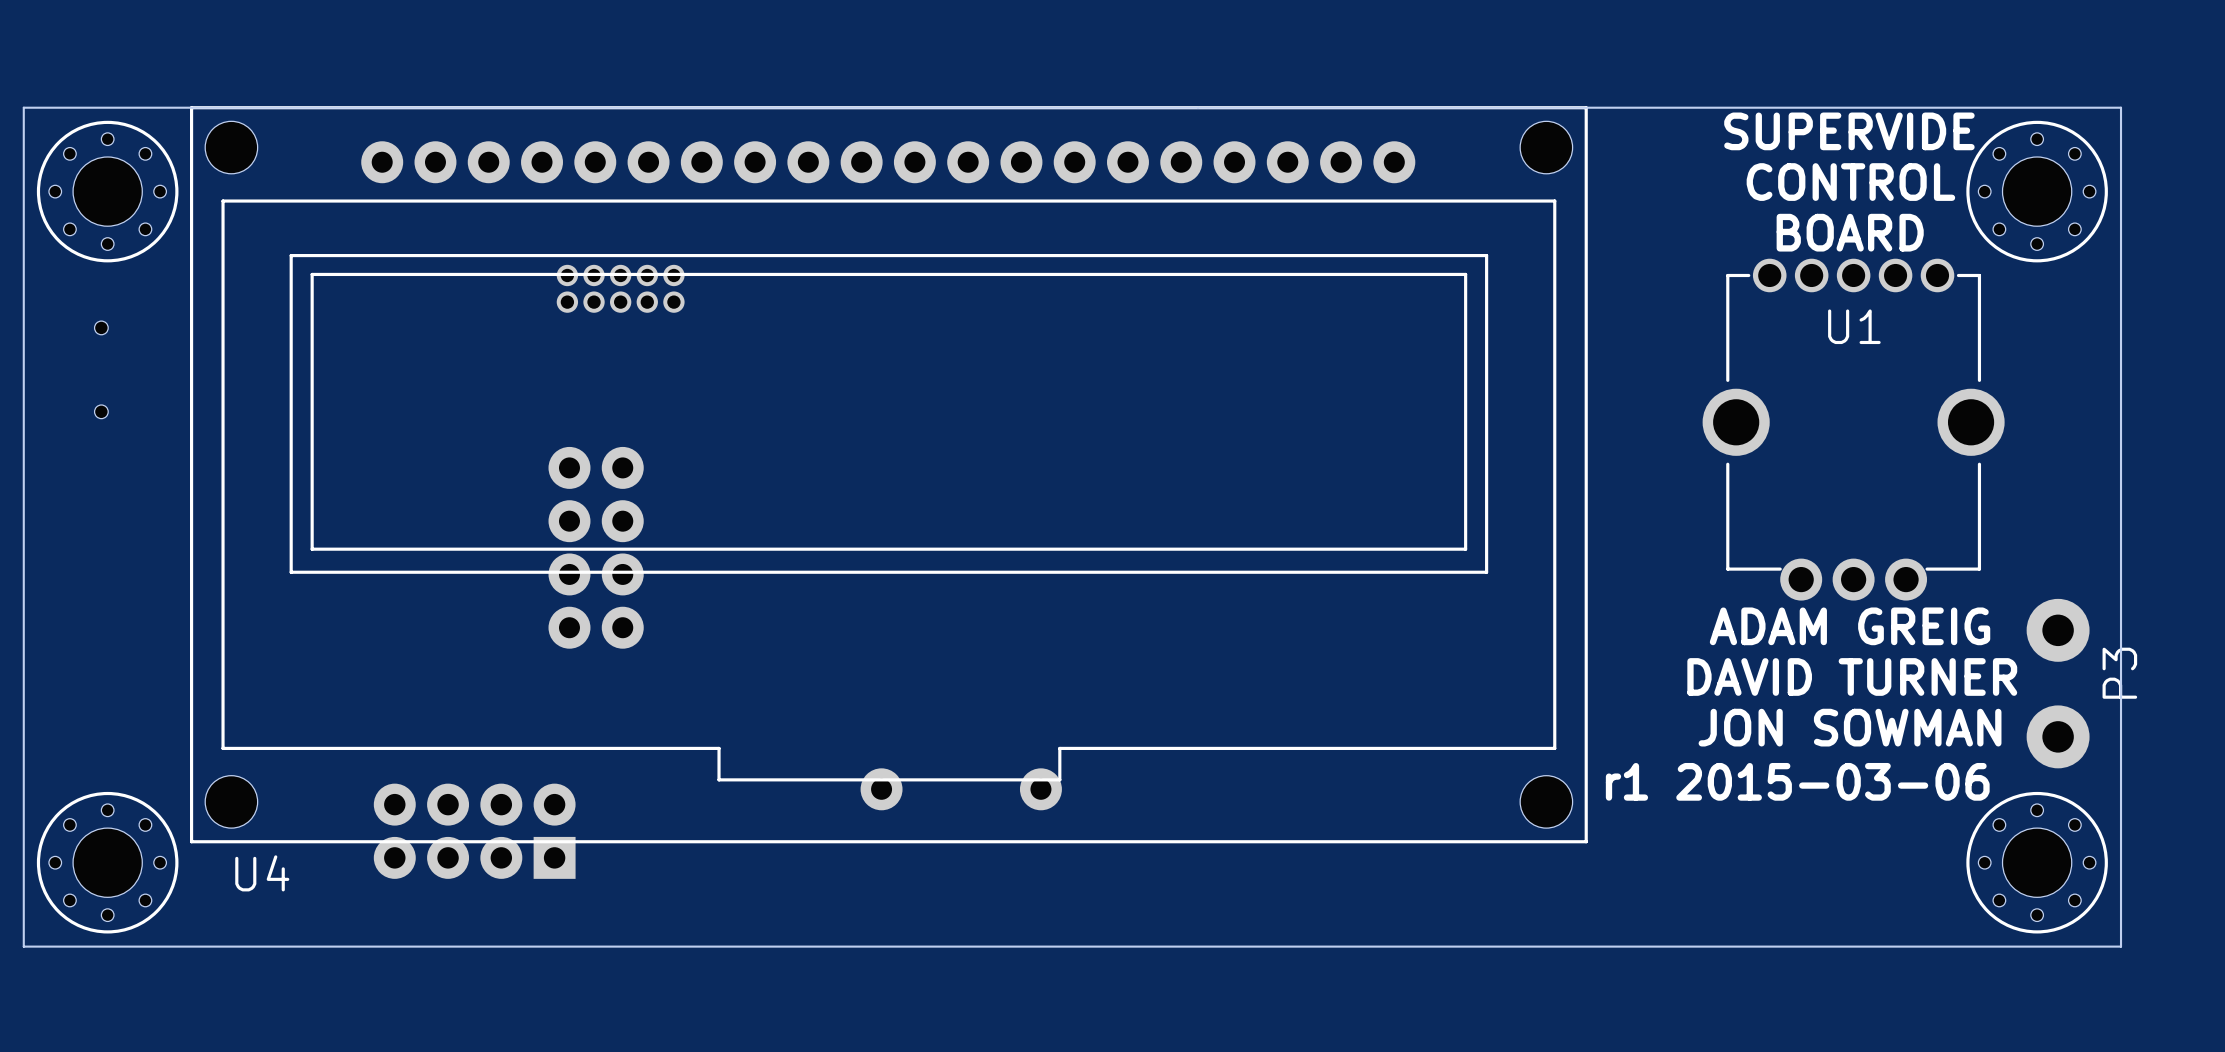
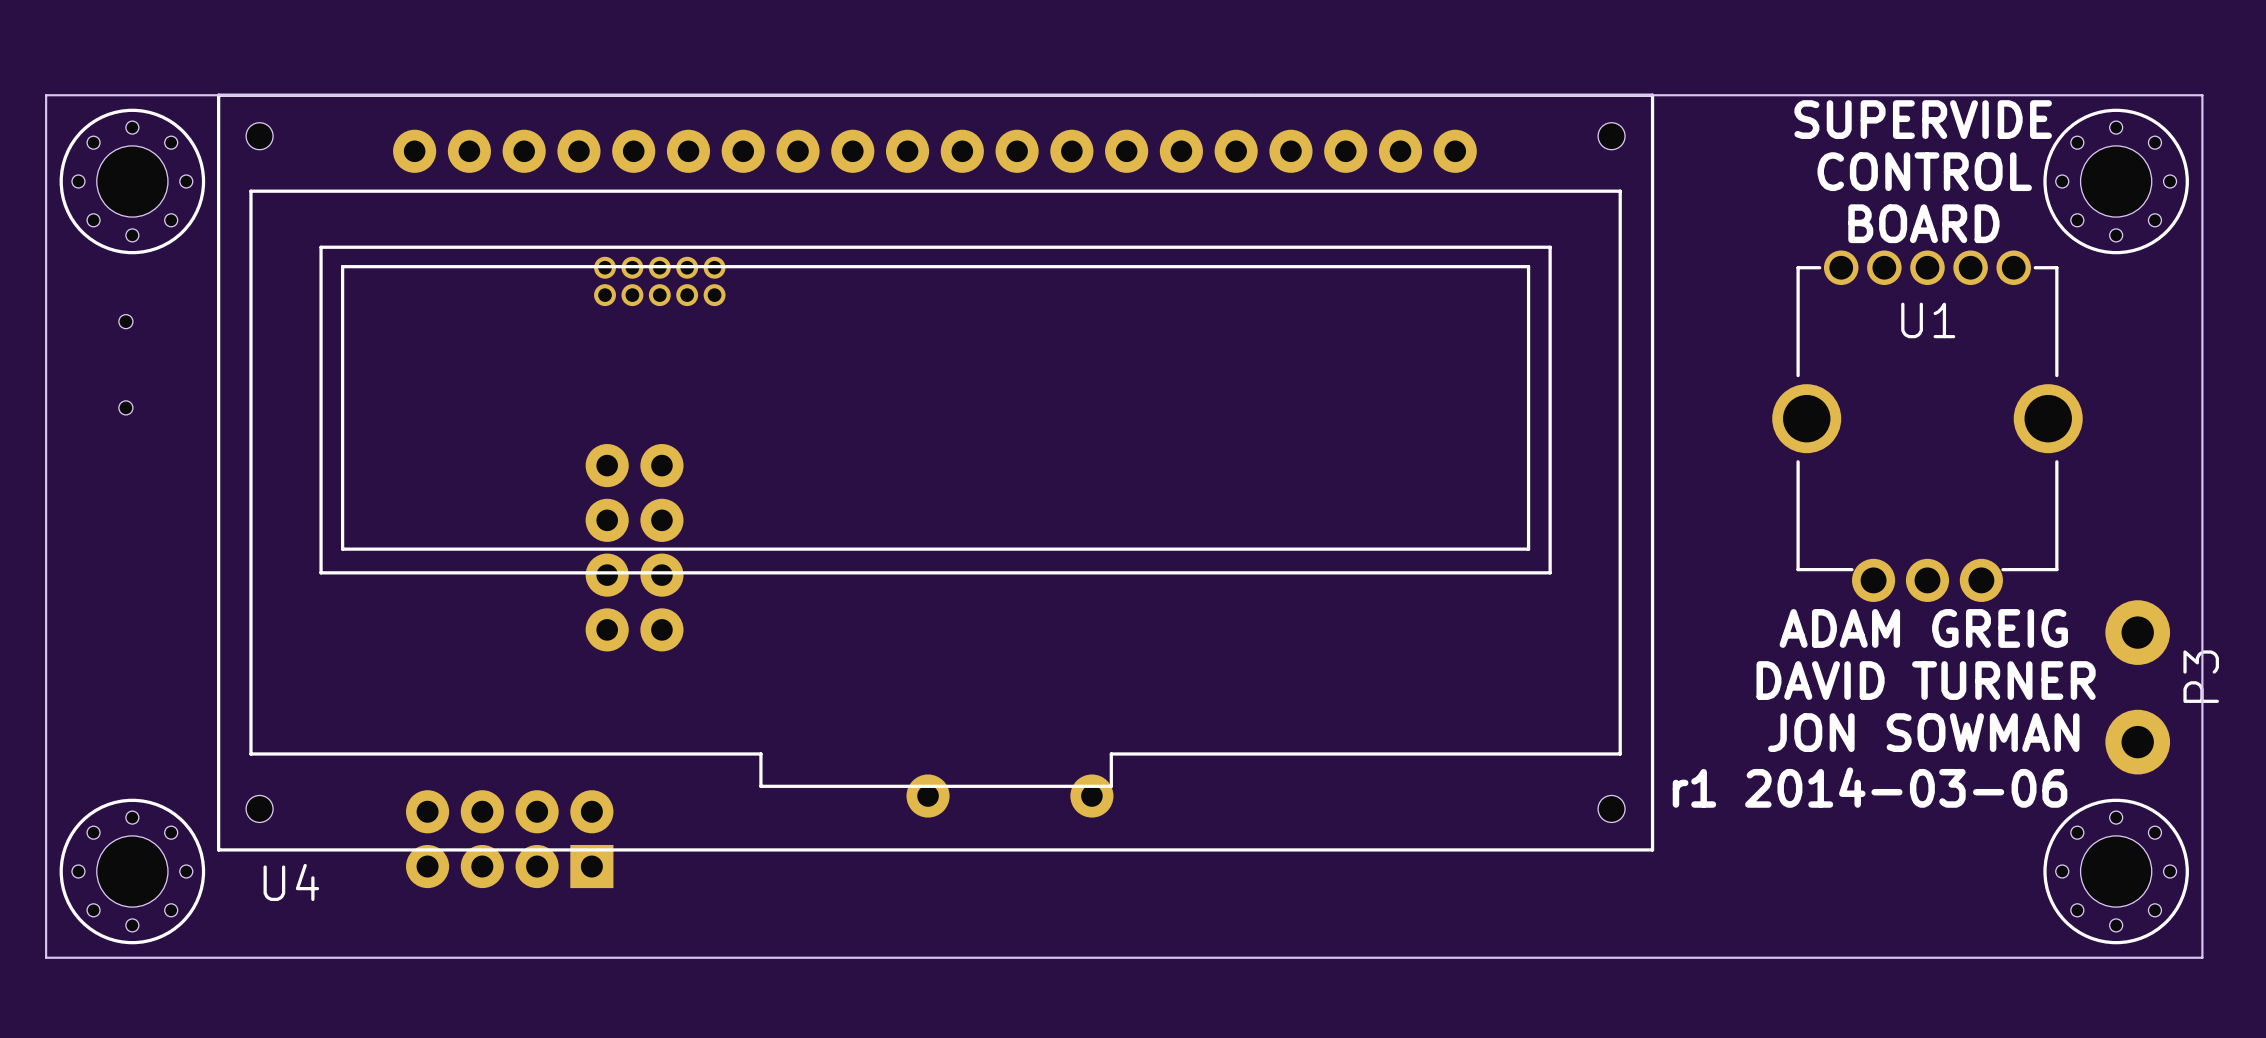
U4 footprint: [189, 106, 1588, 844] -> [217, 93, 1655, 852]
text: r1 2015-03-06 (1797, 781) -> r1 2014-03-06 (1870, 787)

